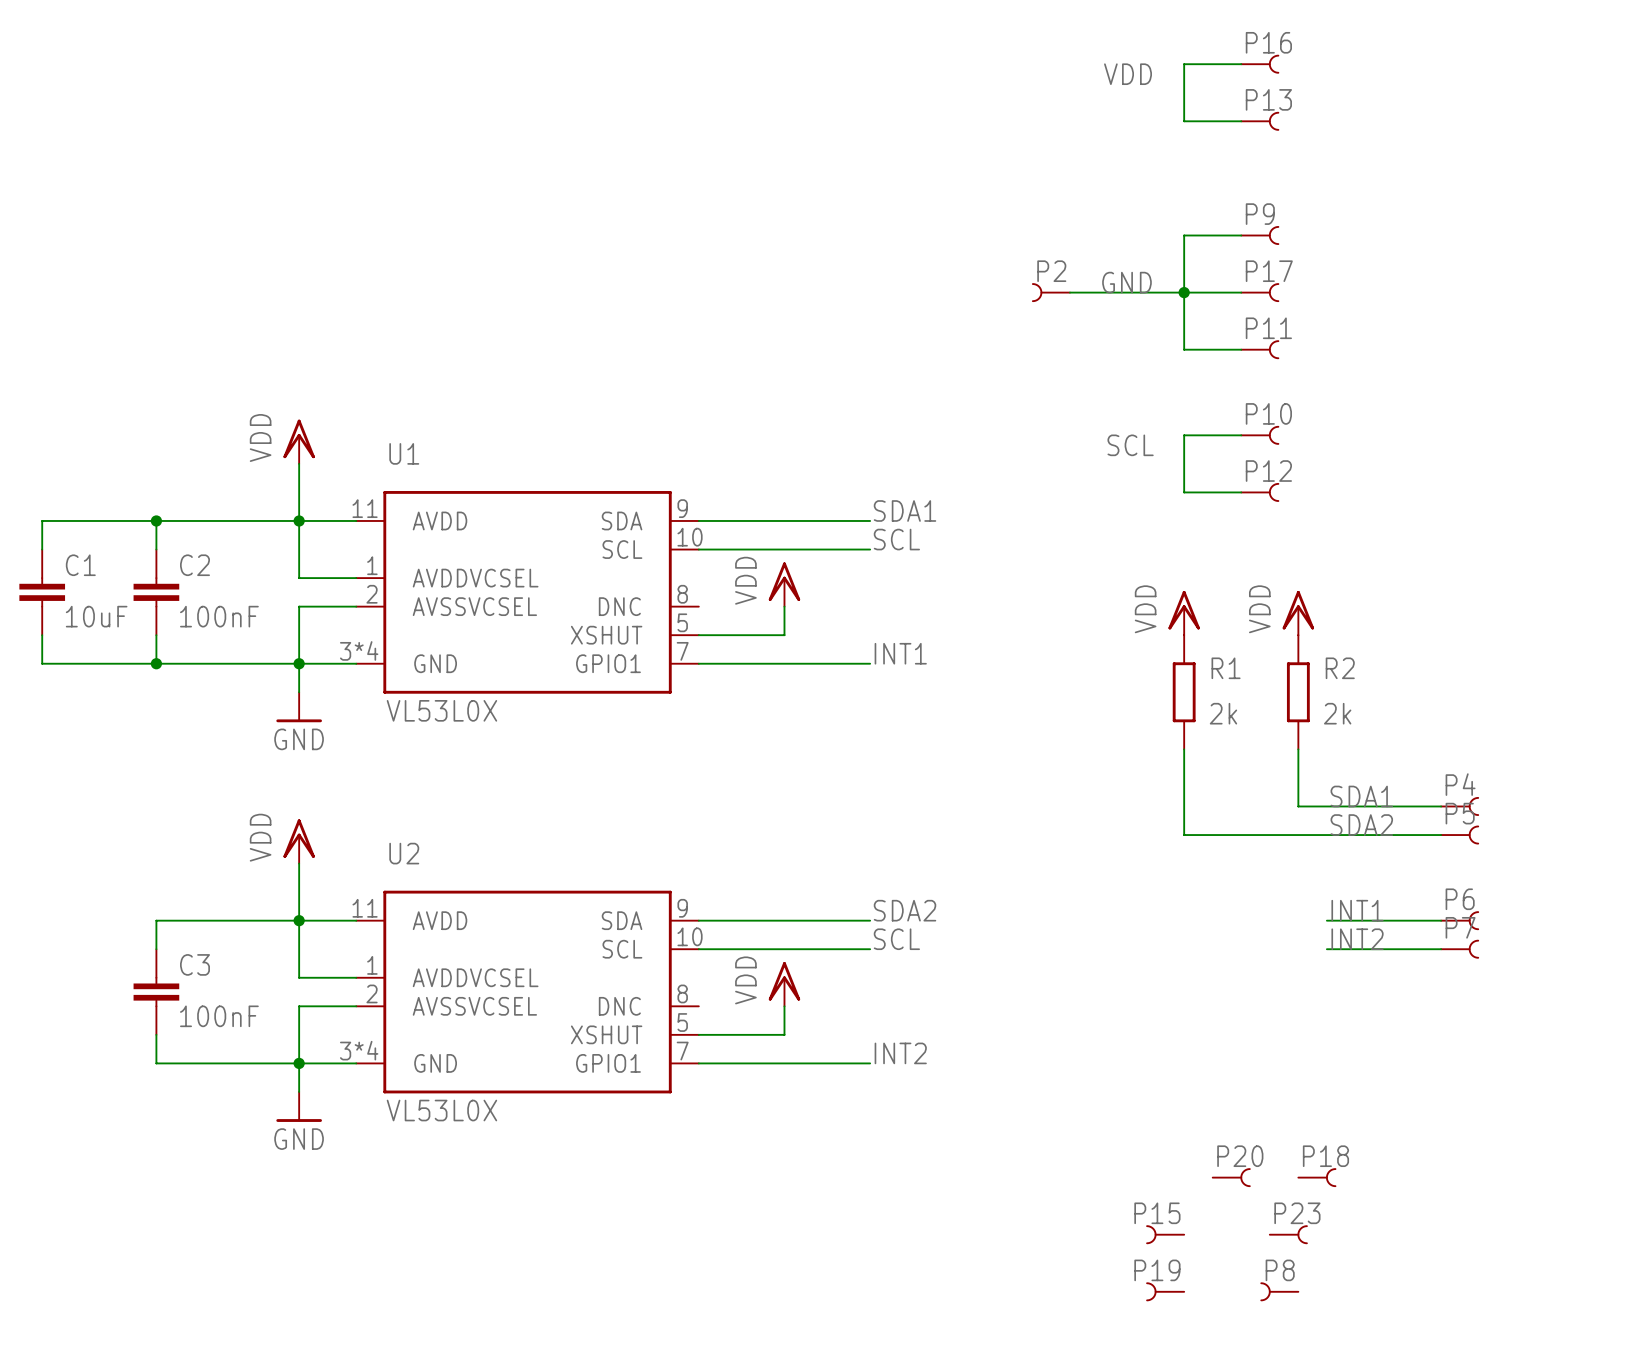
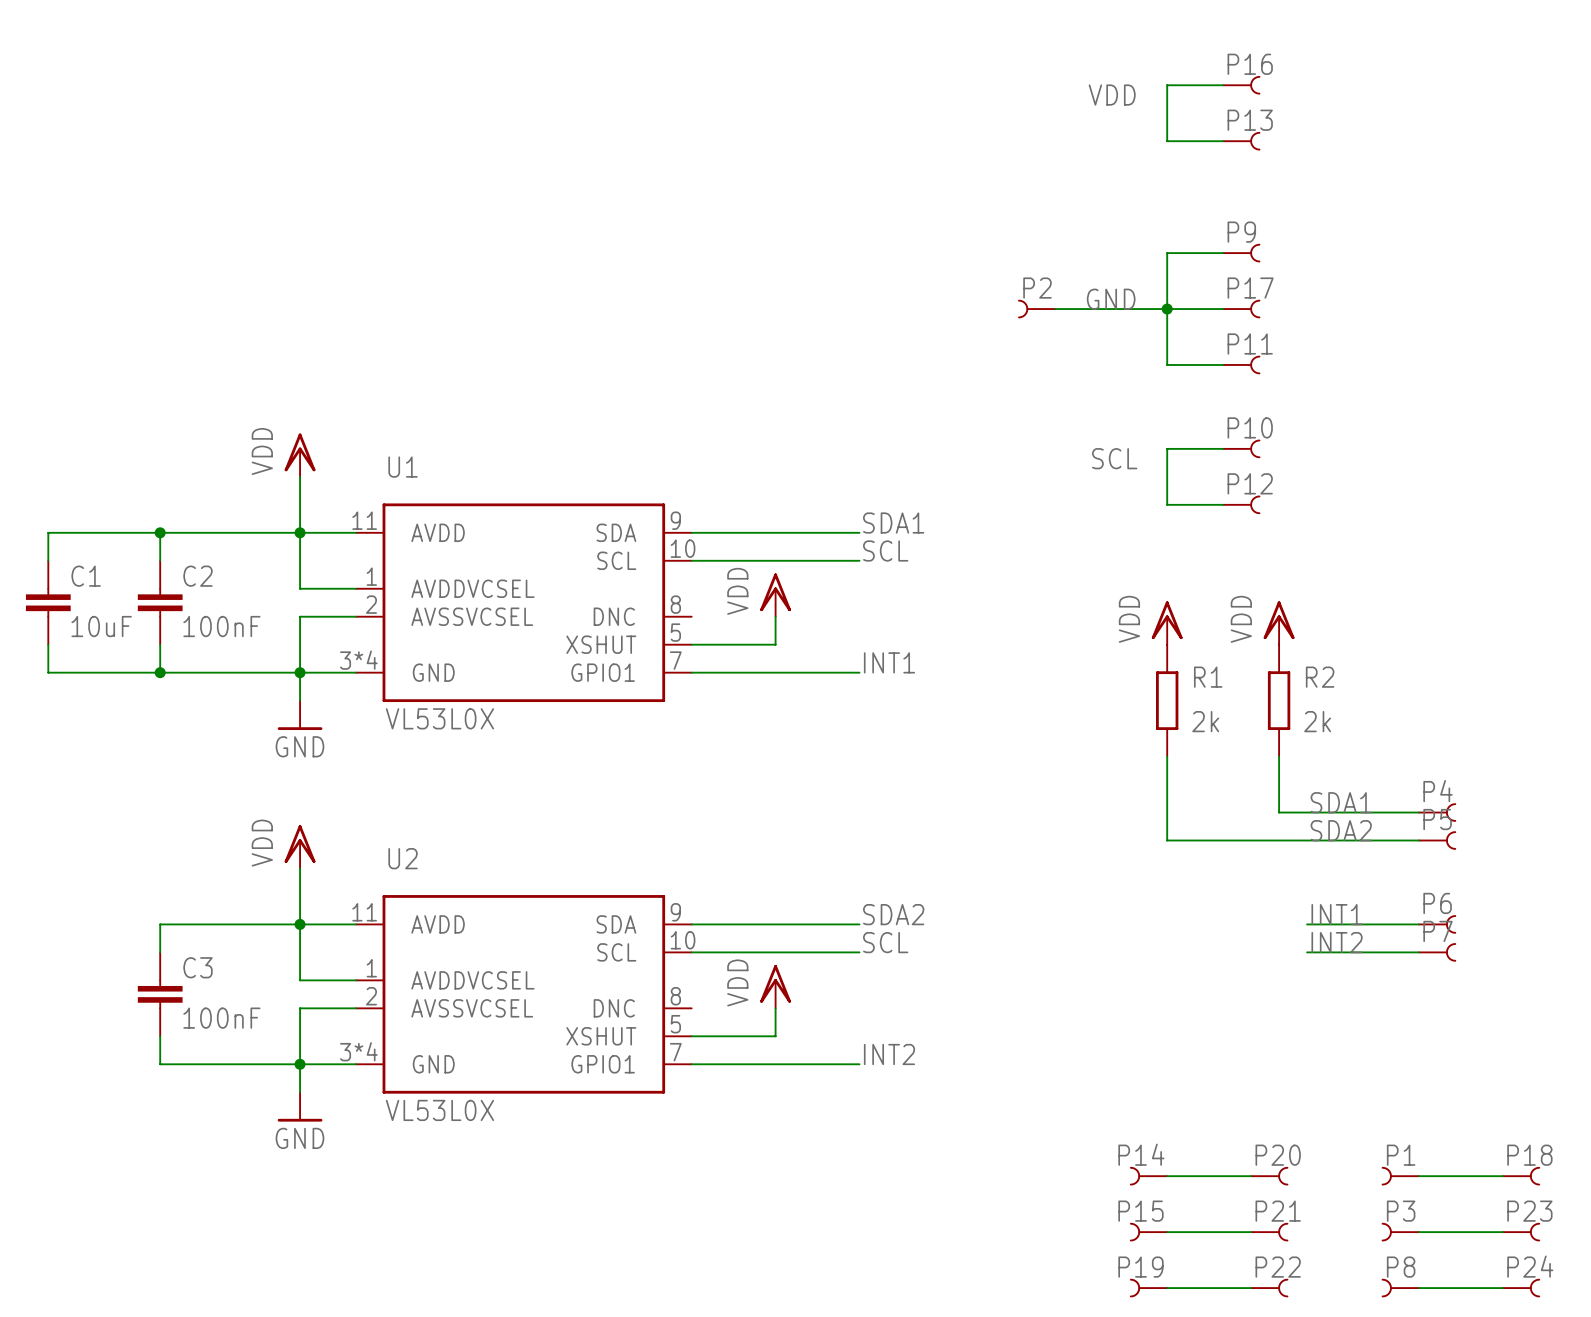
P14: none -> (1148, 1176)
wire: none -> (1167, 1176) (1251, 1176)
P20 position: (1231, 1177) -> (1269, 1176)
P18 position: (1317, 1177) -> (1521, 1176)
P1: none -> (1400, 1176)
wire: none -> (1418, 1176) (1502, 1176)
P23 name: P23 (1297, 1213) -> P21 (1278, 1211)
wire: none -> (1167, 1232) (1251, 1232)
P3: none -> (1400, 1232)
wire: none -> (1418, 1232) (1502, 1232)
P23: none -> (1521, 1232)
wire: none -> (1167, 1288) (1251, 1288)
P8 position: (1279, 1291) -> (1400, 1288)
P22: none -> (1269, 1288)
wire: none -> (1418, 1288) (1502, 1288)
P24: none -> (1521, 1288)

